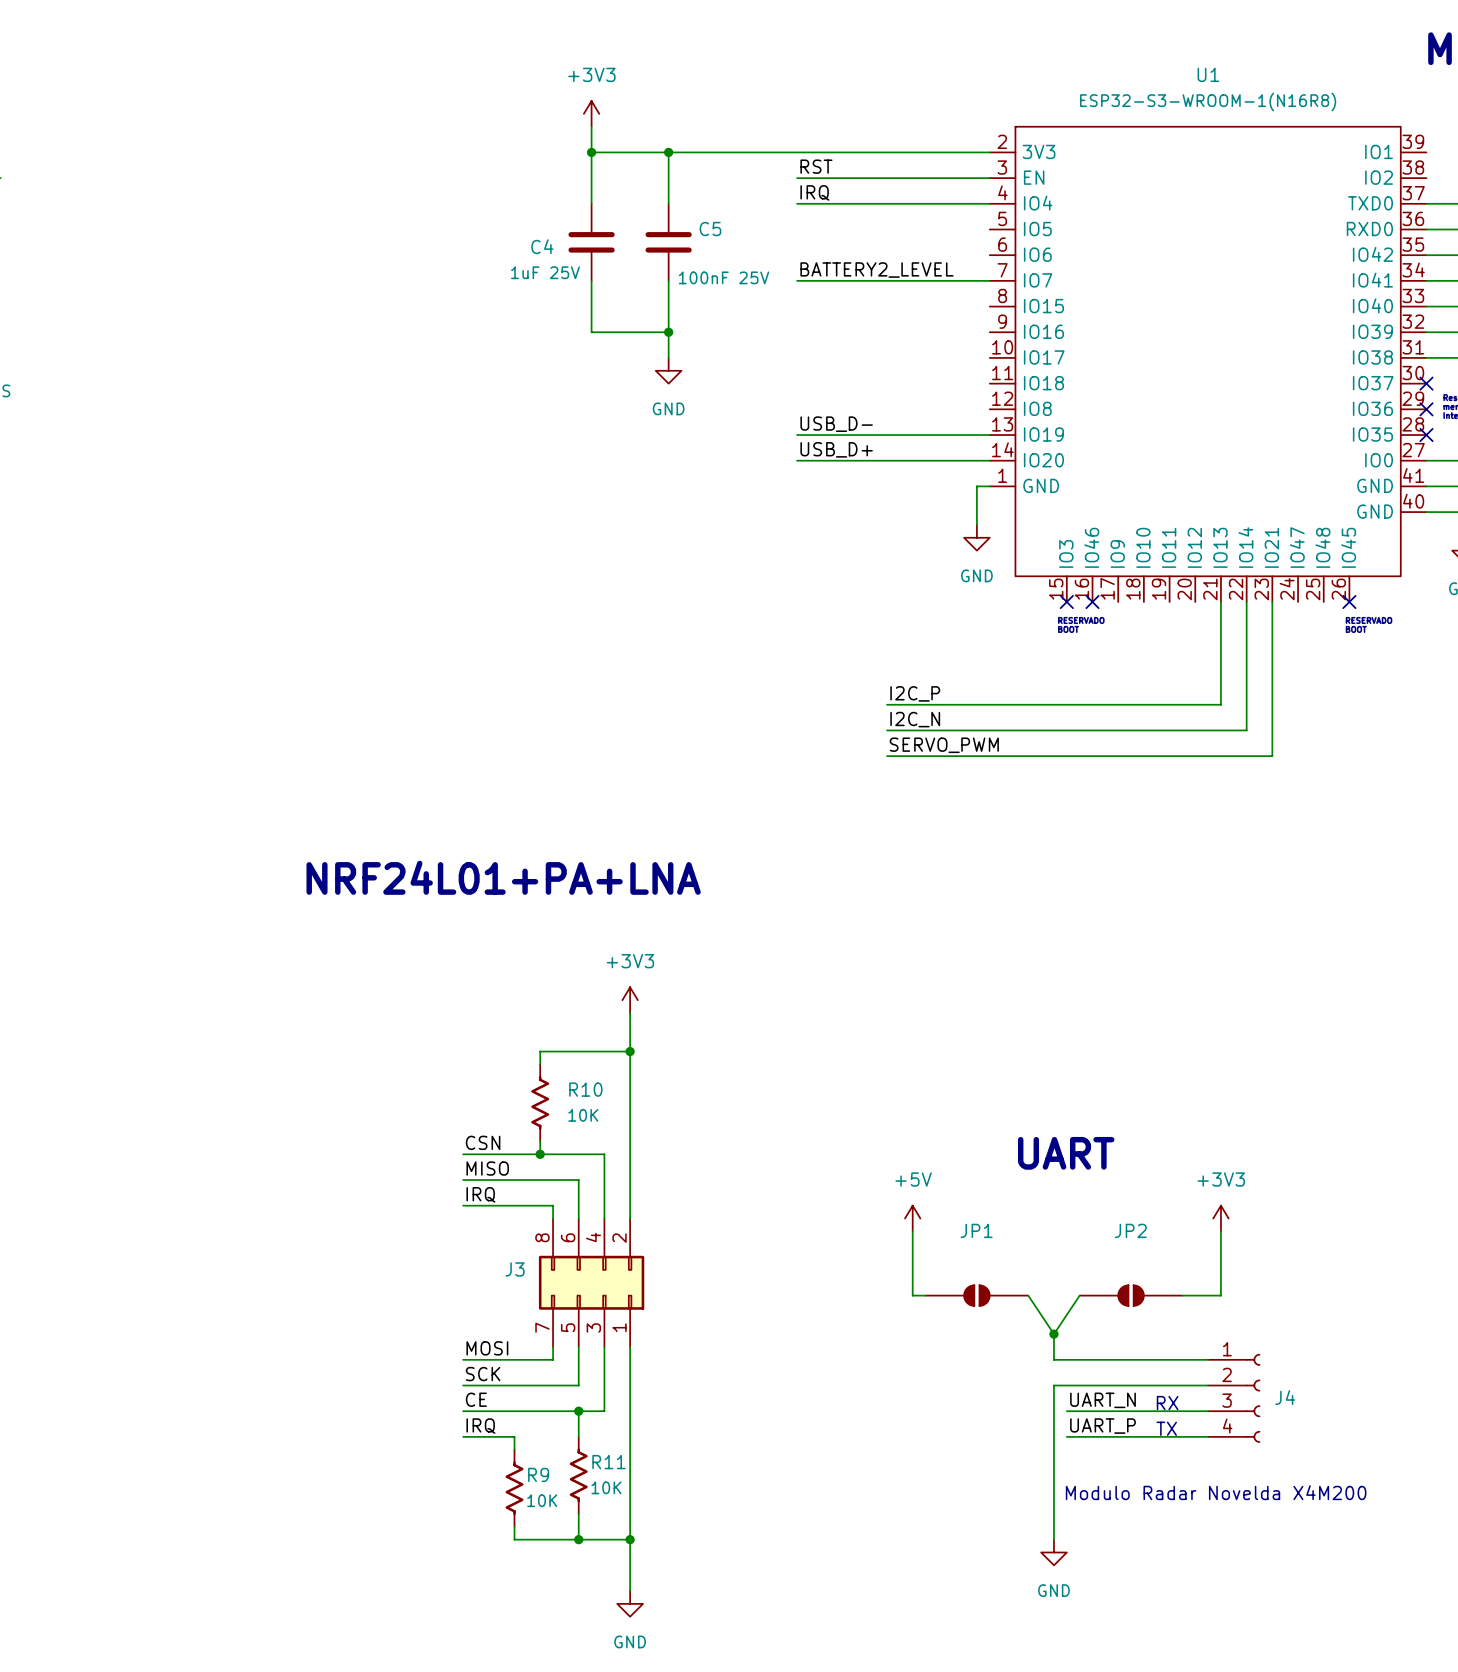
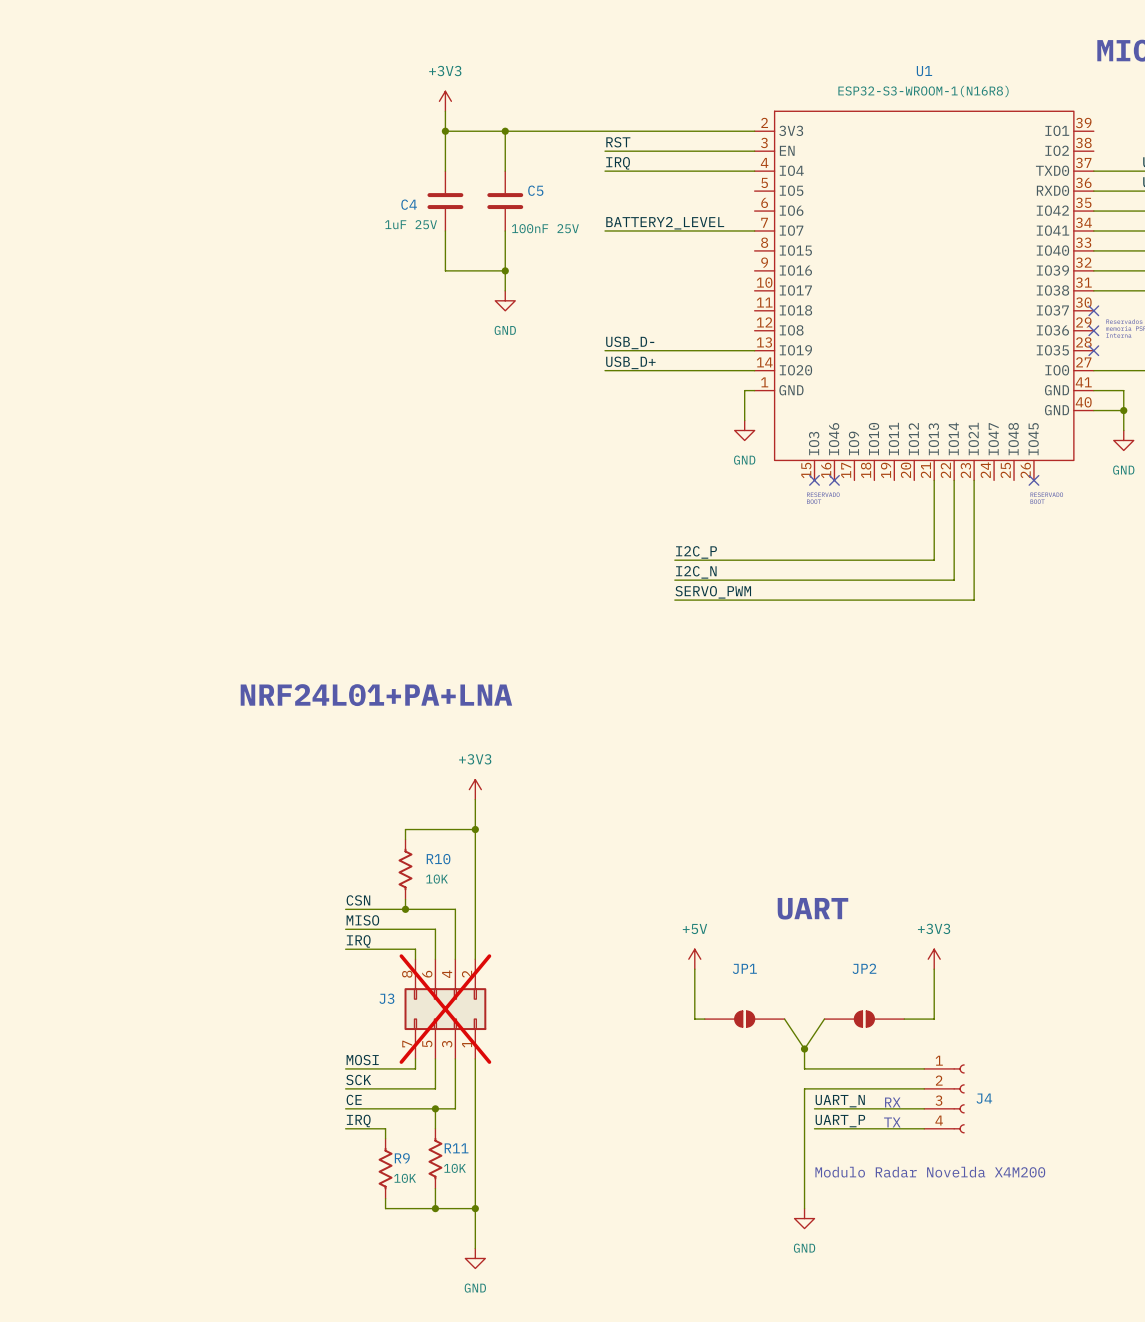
J3 do-not-place cross: none -> (445, 1009)

